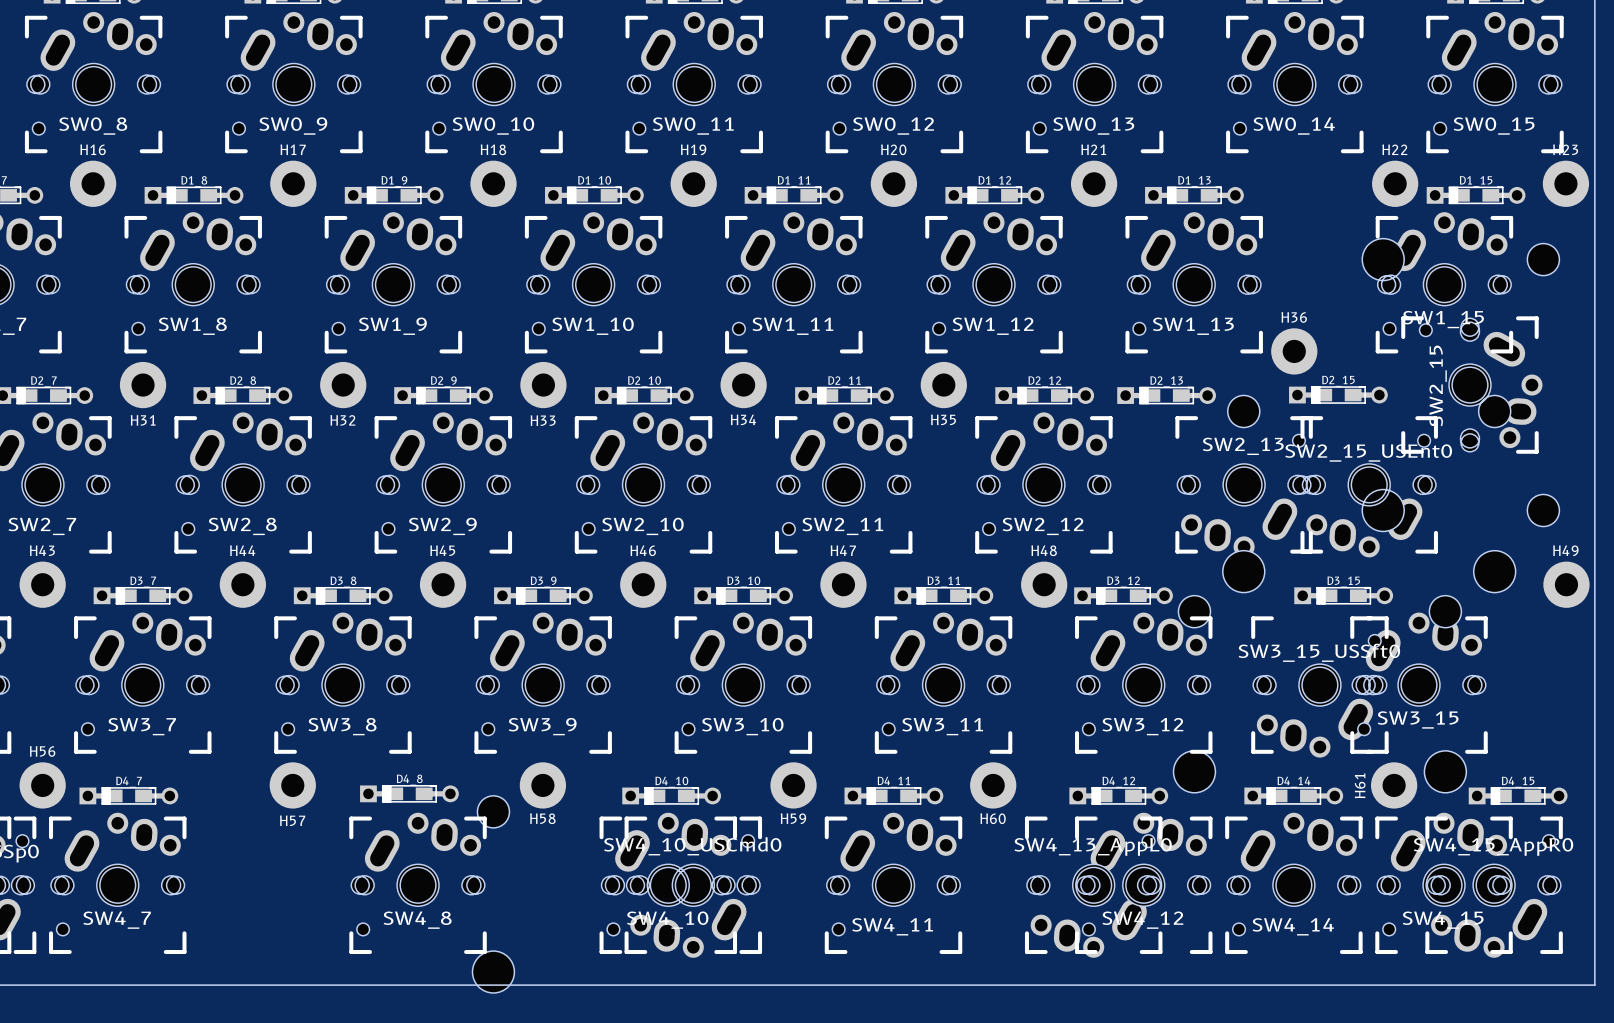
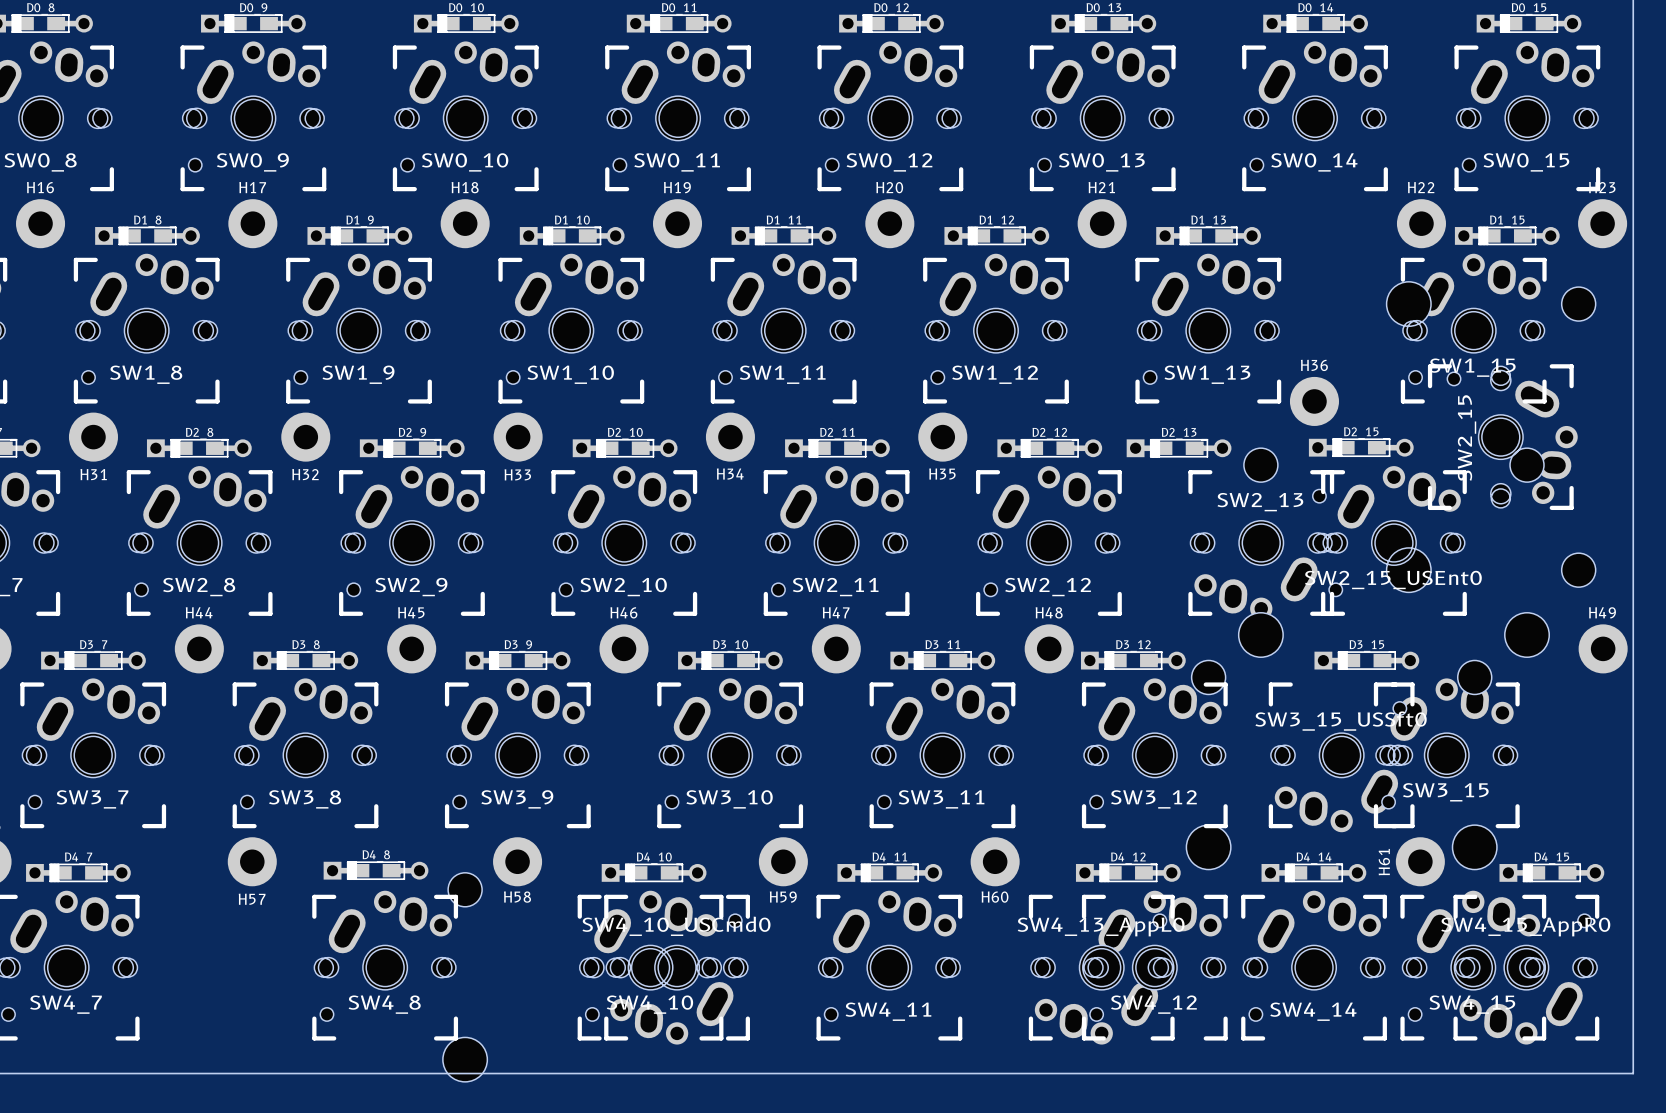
SW2_15_USEnt0 footprint: [1222, 395, 1516, 593] -> [1238, 448, 1550, 658]
SW2_15_USEnt0 name position: SW2_15_USEnt0 (1368, 453) -> SW2_15_USEnt0 (1393, 579)

